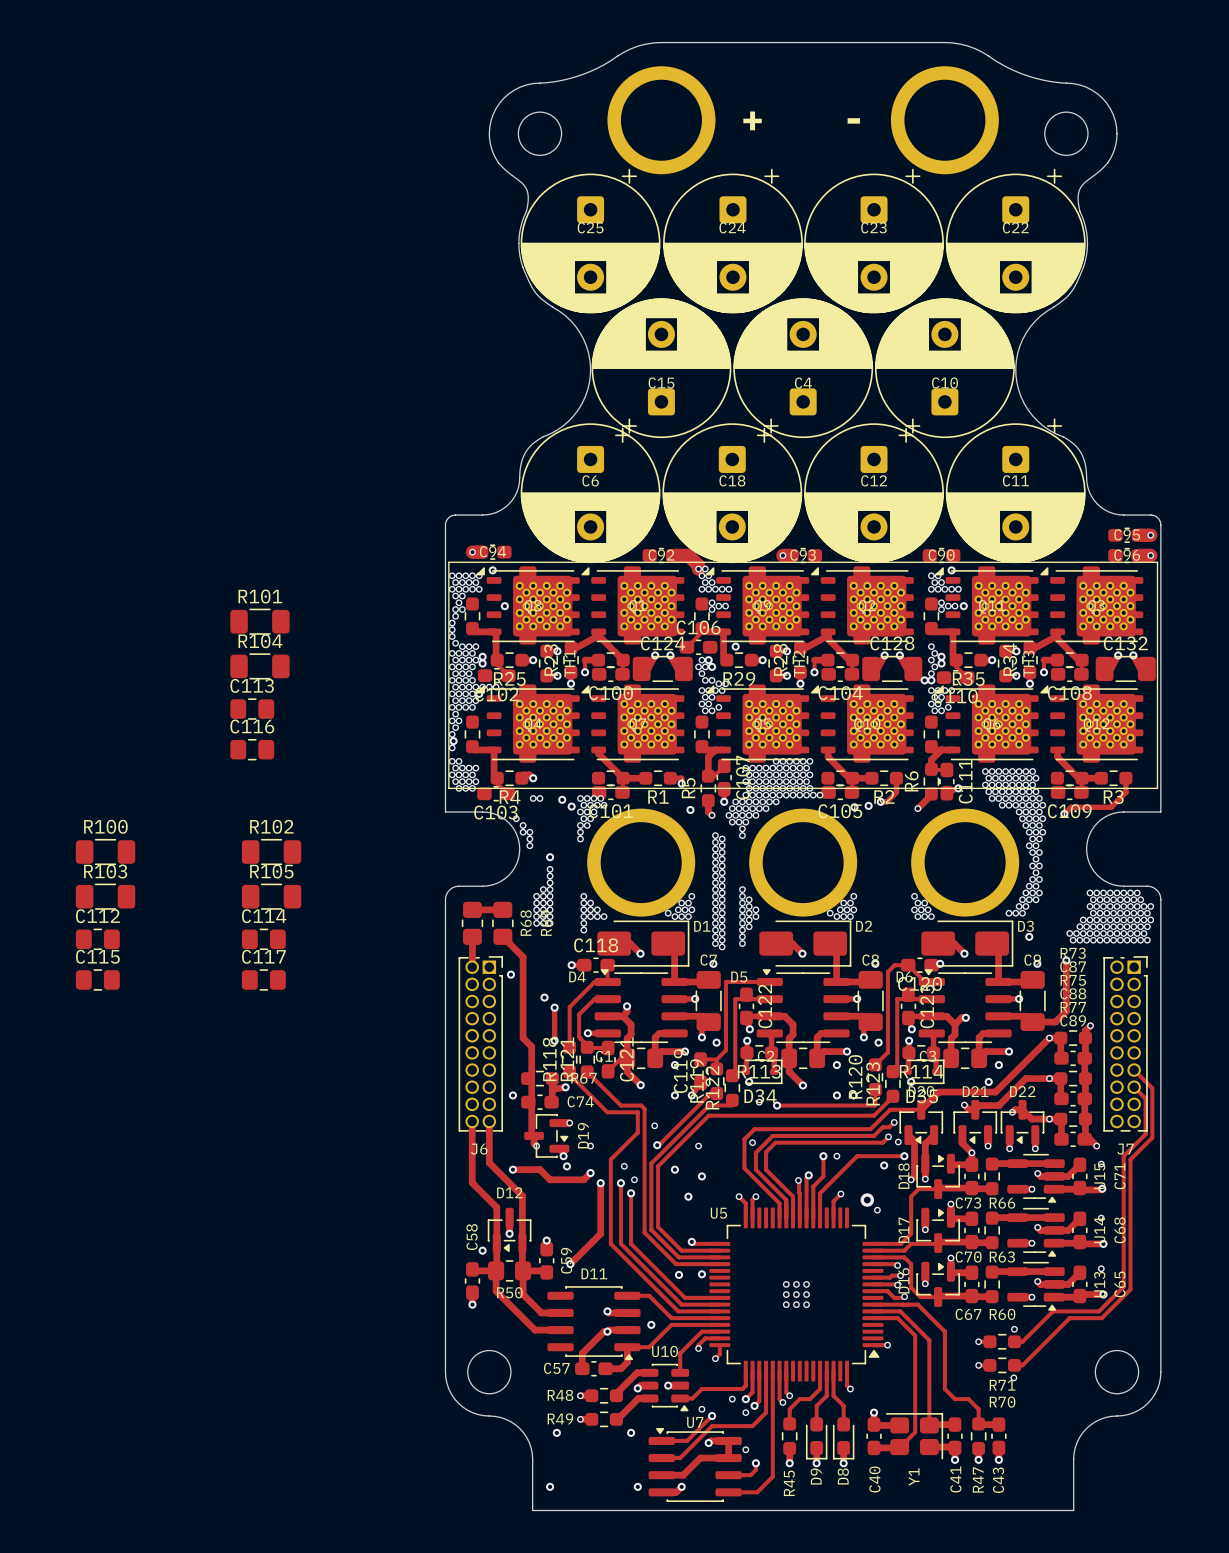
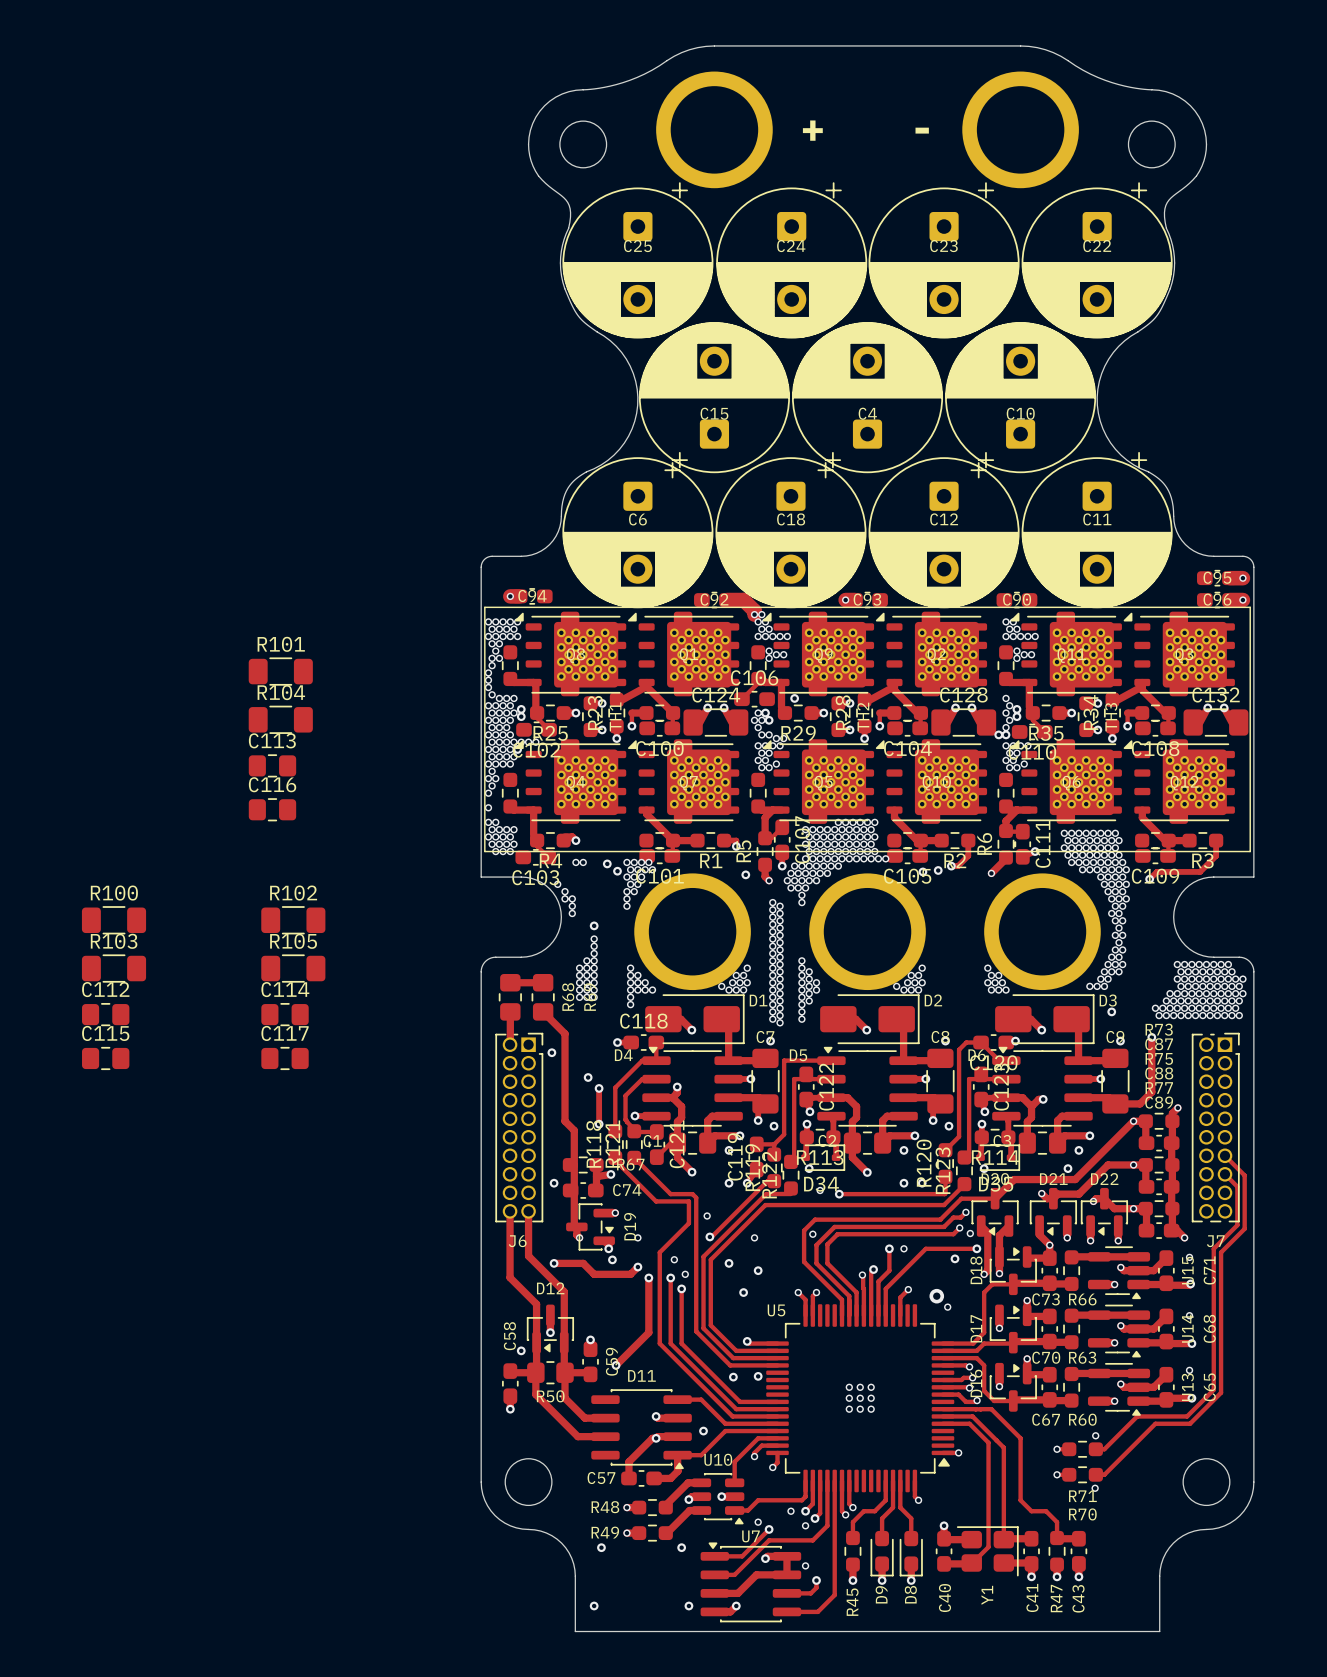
via: (492, 570) -> none
via: (951, 570) -> none
via: (504, 606) -> none
via: (963, 606) -> none
via: (453, 741) -> none

